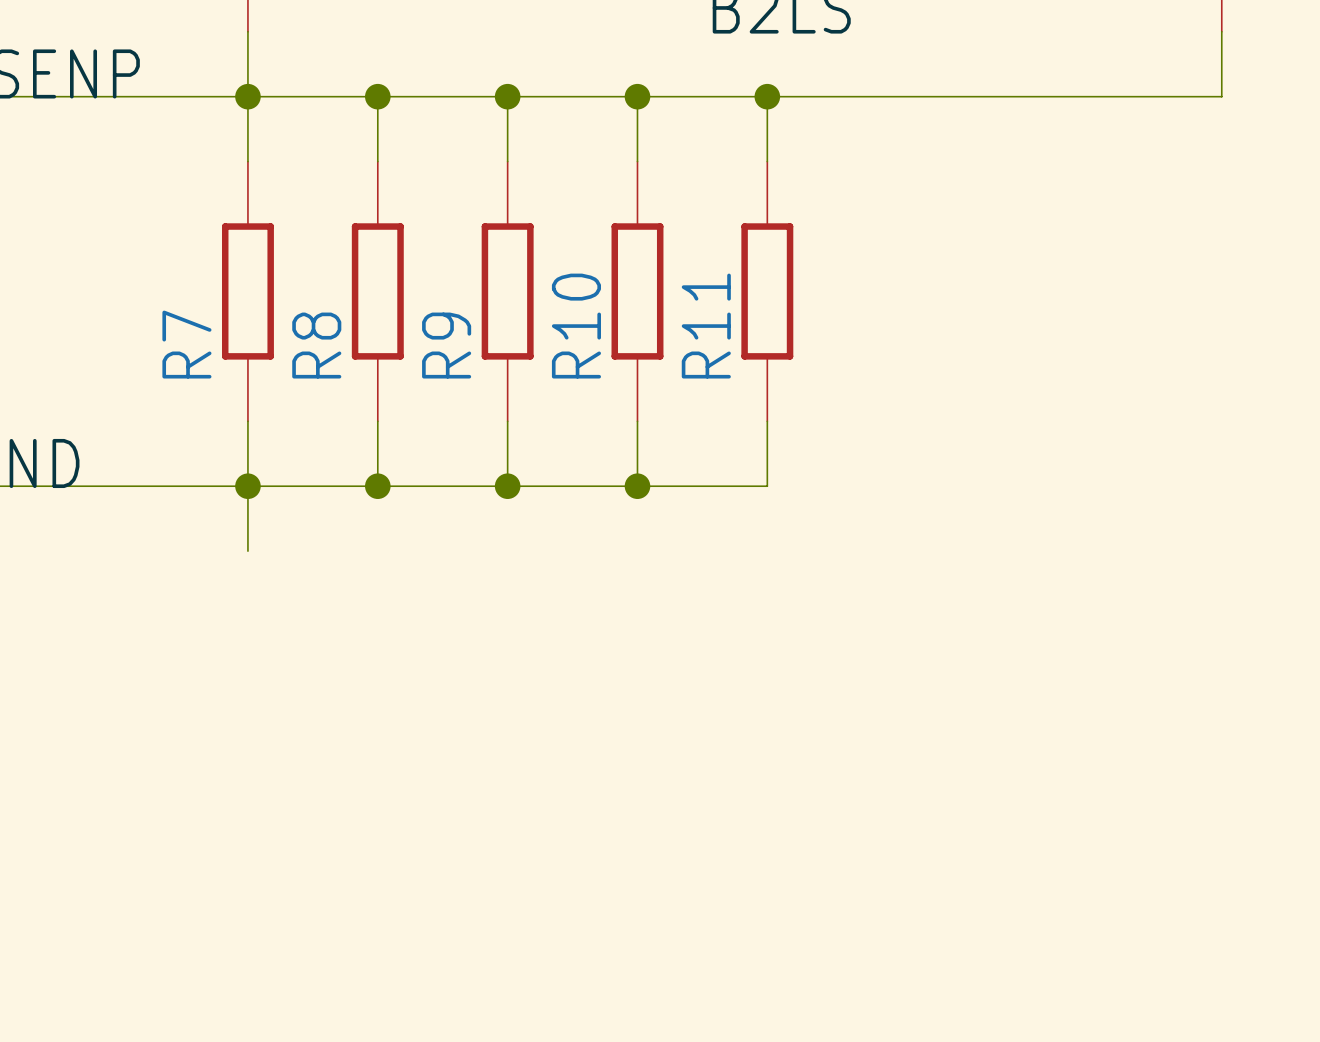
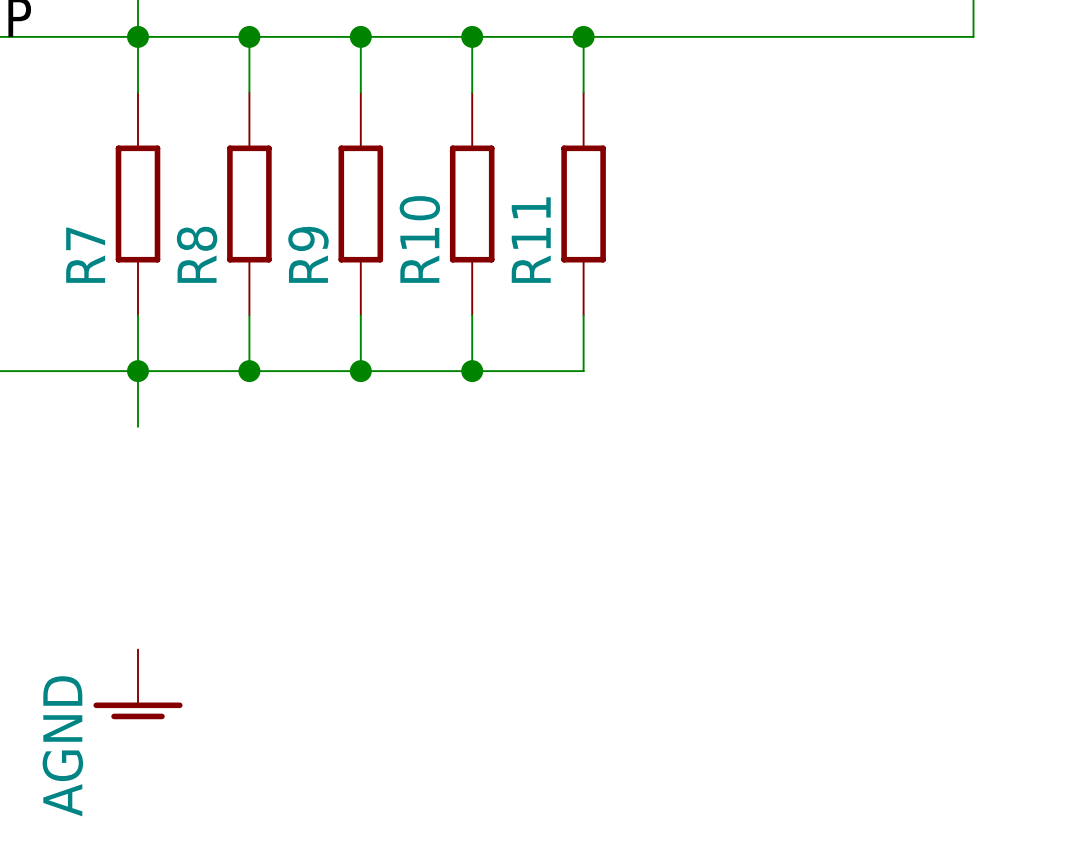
power symbol: none -> AGND (138, 684)

